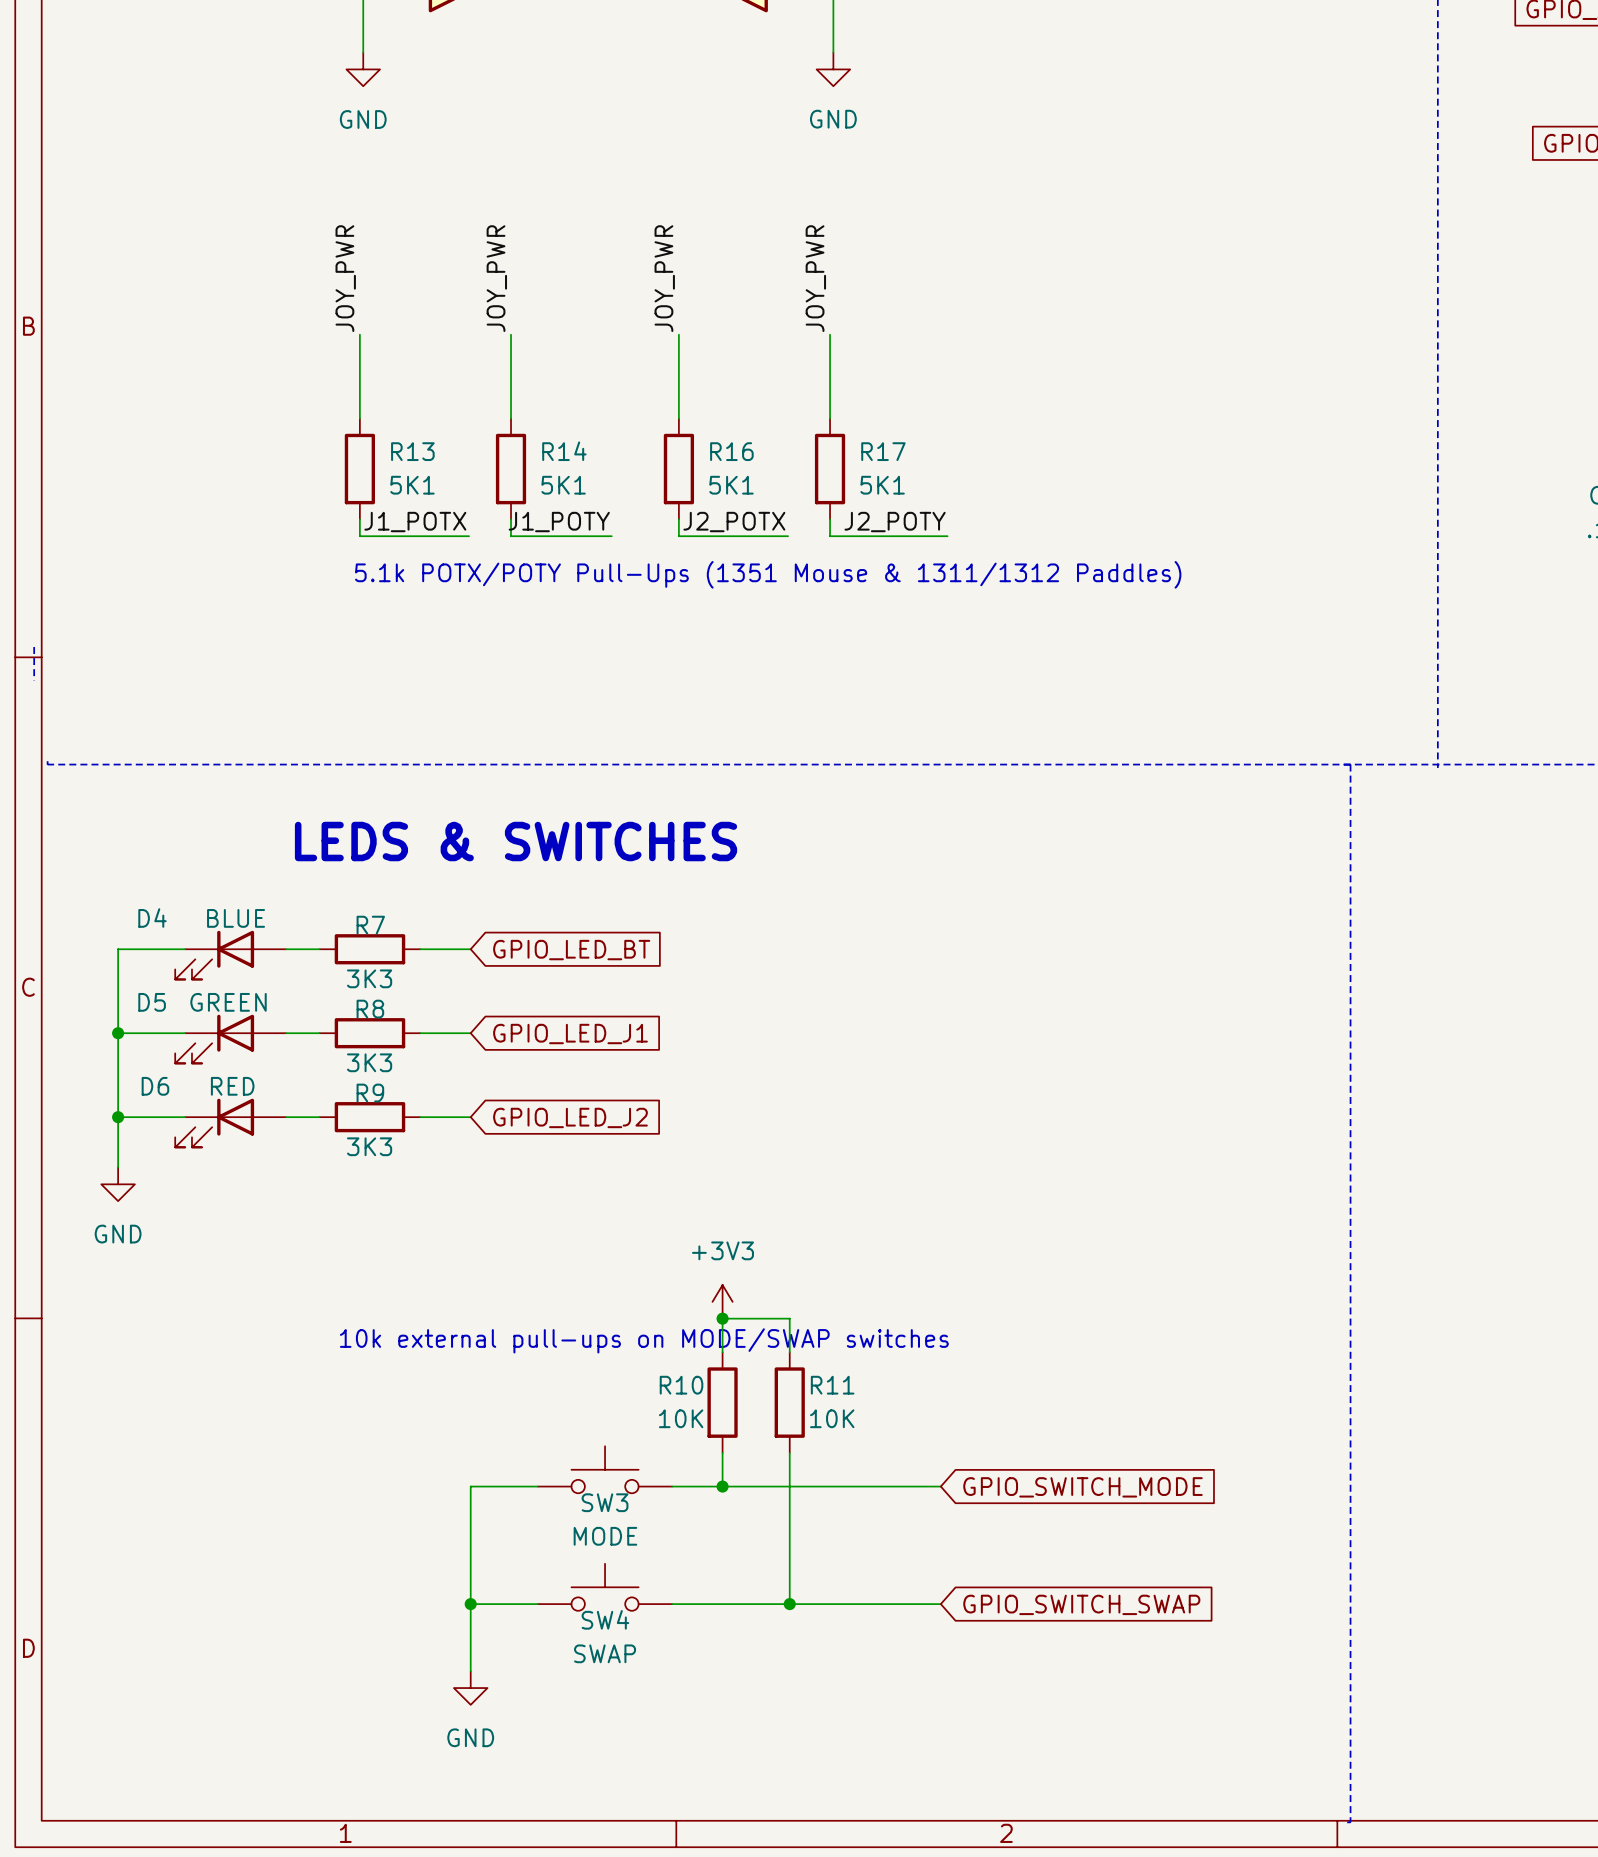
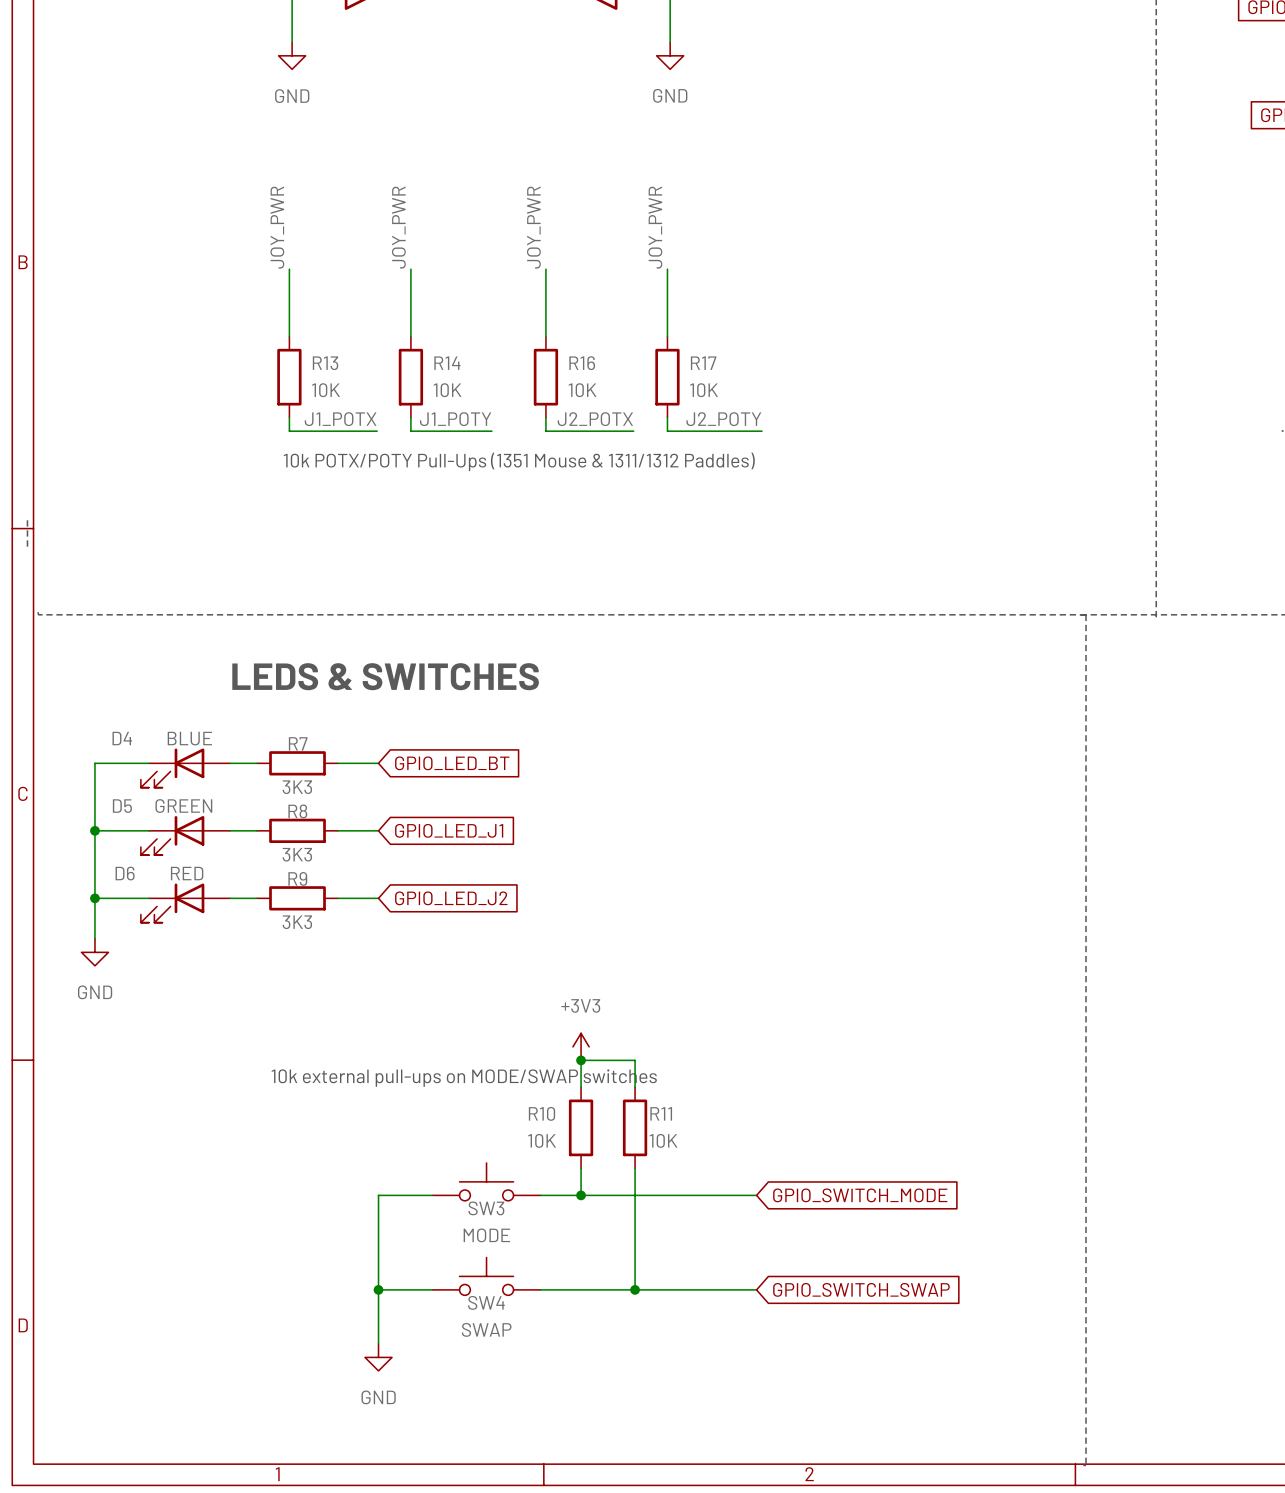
R13 value: 5K1 (412, 485) -> 10K (326, 390)
R14 value: 5K1 (563, 485) -> 10K (447, 390)
R16 value: 5K1 (731, 485) -> 10K (582, 390)
R17 value: 5K1 (882, 485) -> 10K (704, 390)
text: 5.1k POTX/POTY Pull-Ups (1351 Mouse & 1311/1312 Paddles) (768, 574) -> 10k POTX/POTY Pull-Ups (1351 Mouse & 1311/1312 Paddles) (519, 461)

